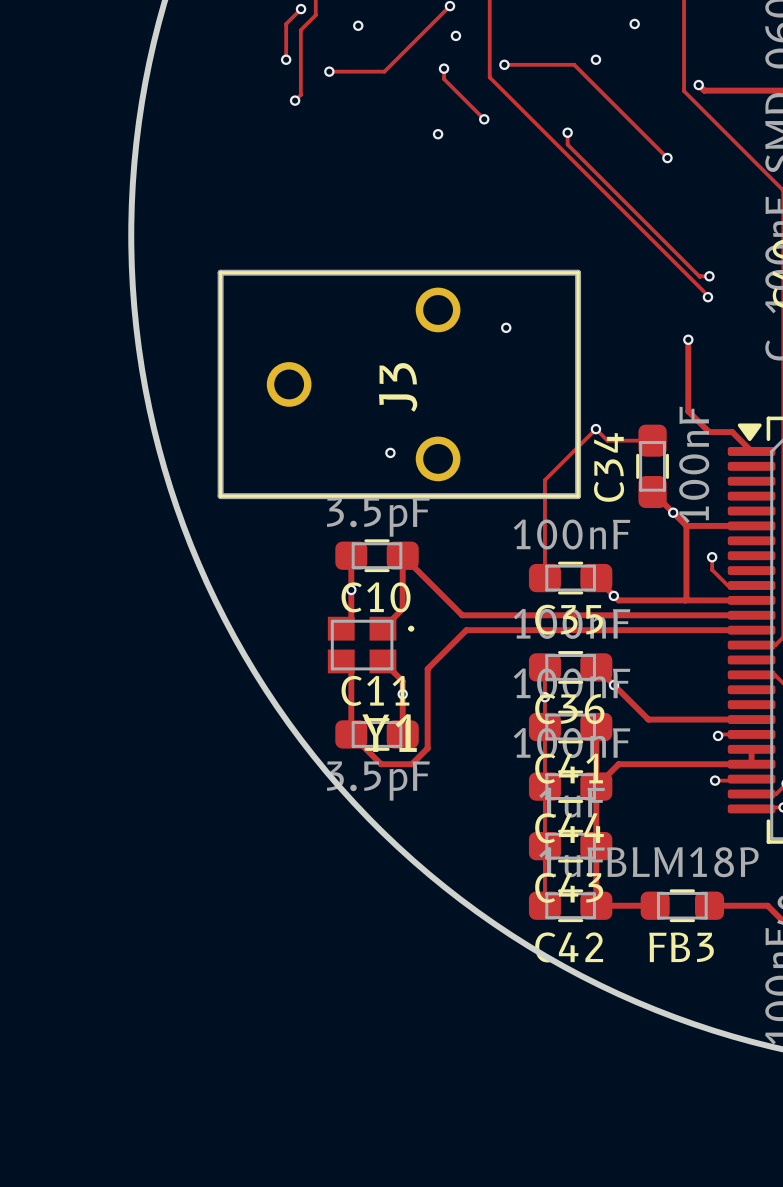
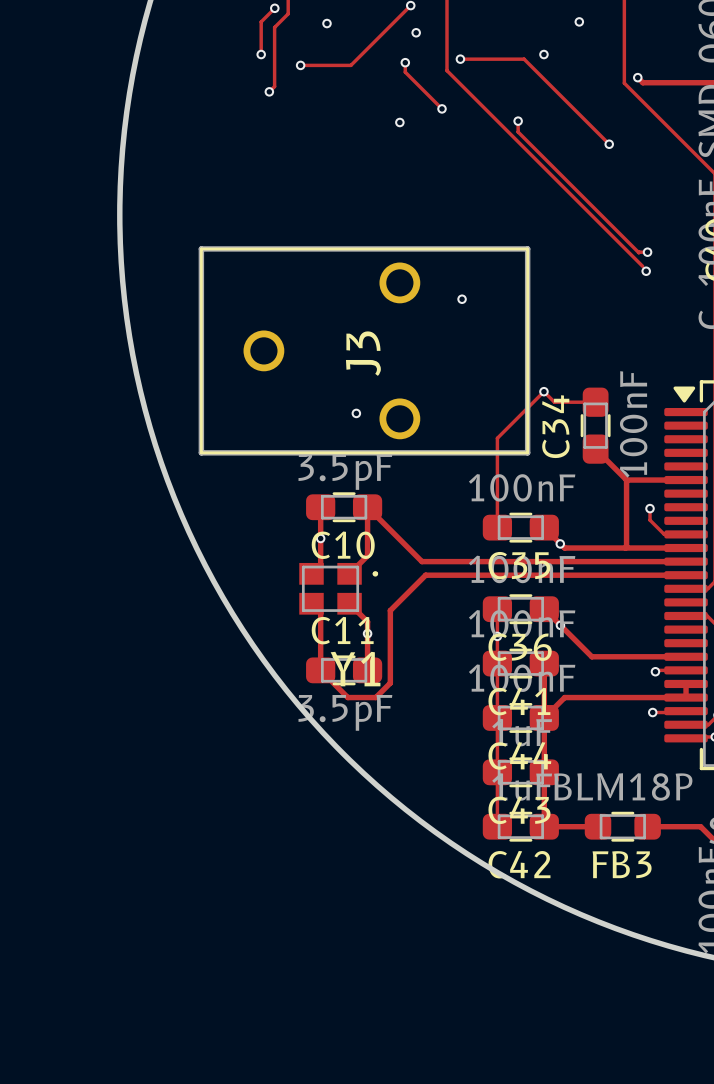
track: (688, 339) (688, 411) (709, 432) (732, 432) (751, 451) -> none
via: (688, 339) -> none
via: (673, 512) -> none

